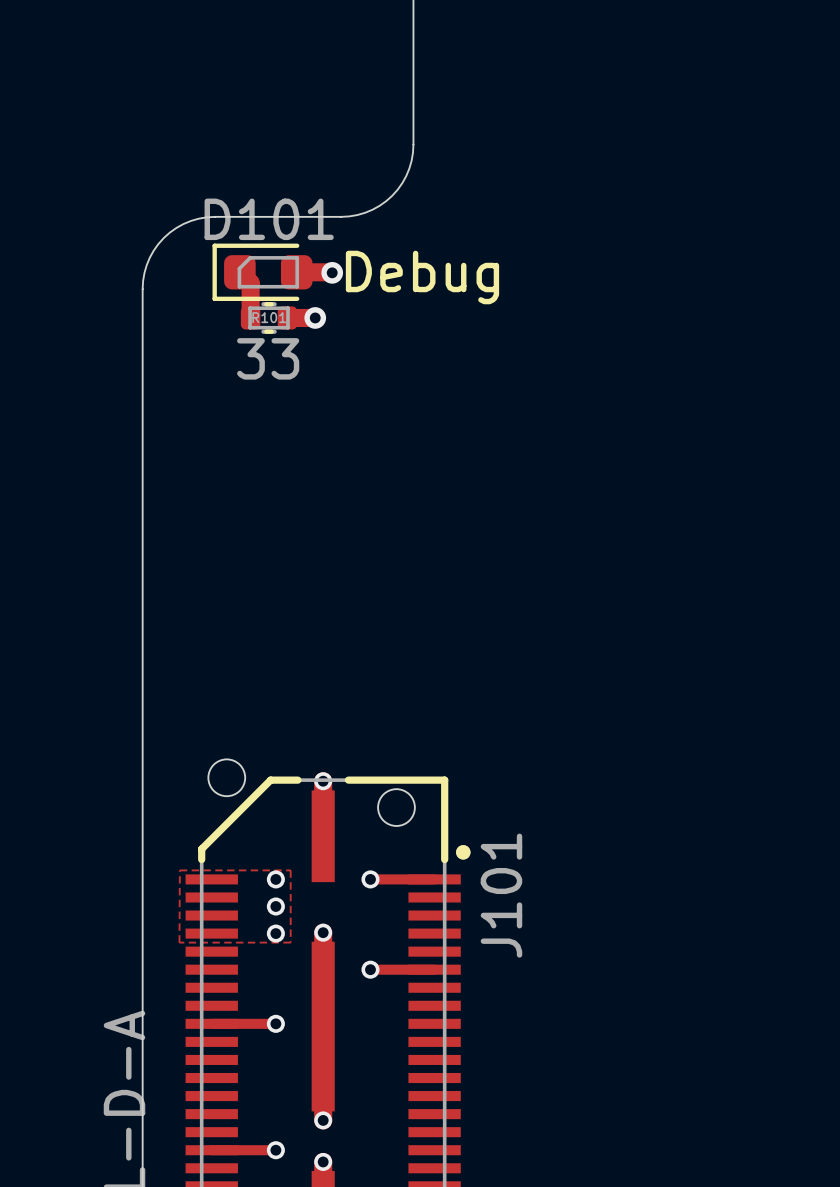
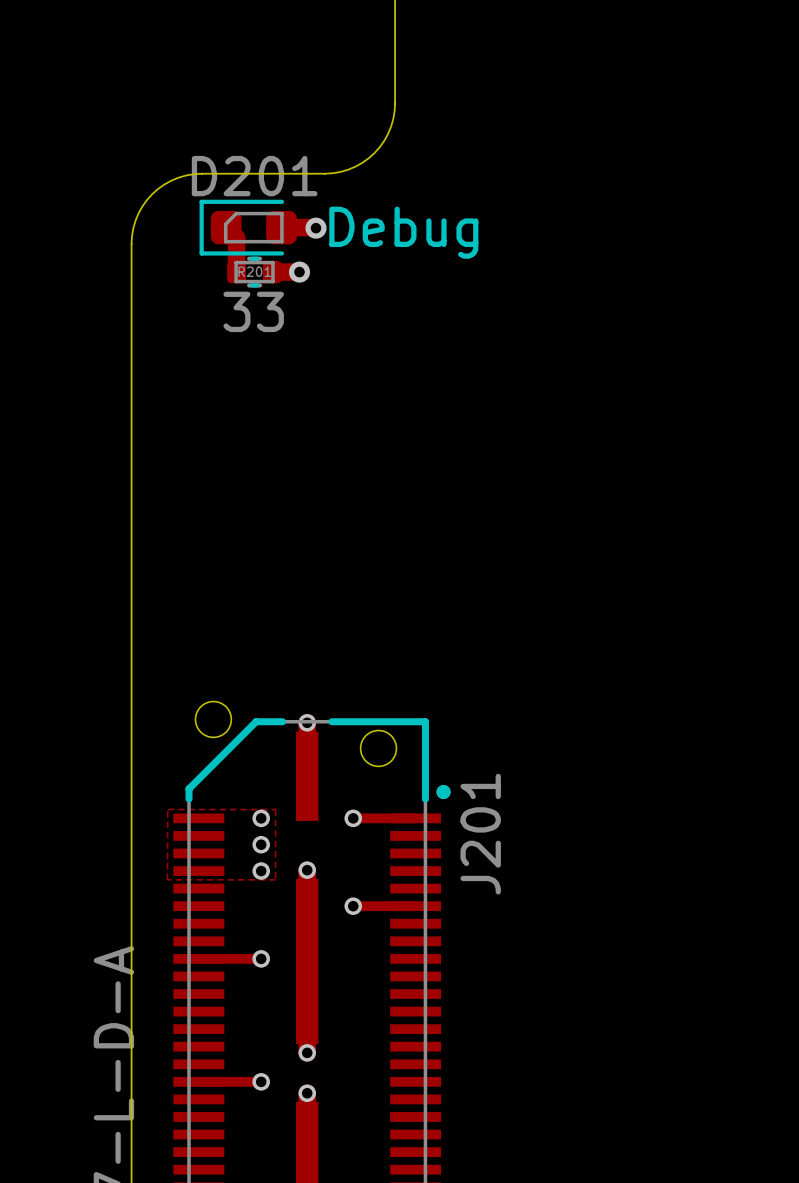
D101 name: D101 (269, 219) -> D201 (254, 176)
R101 name: R101 (269, 317) -> R201 (254, 271)
J101 name: J101 (501, 895) -> J201 (480, 834)

